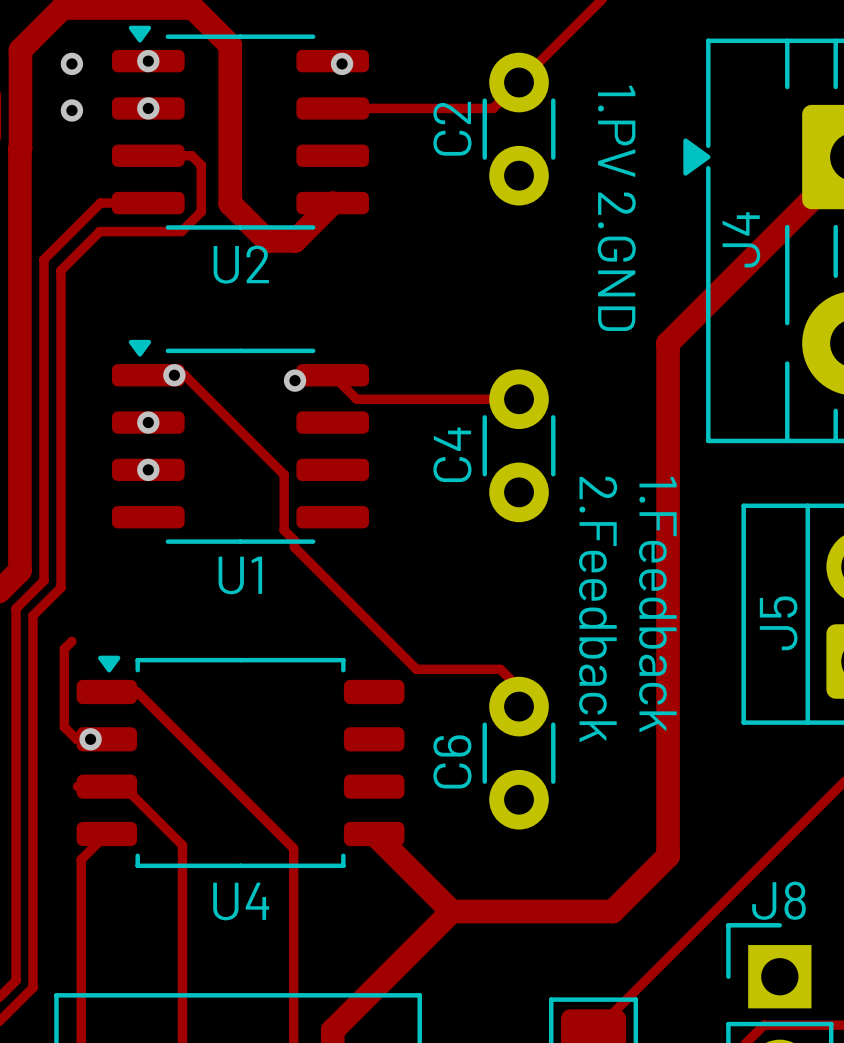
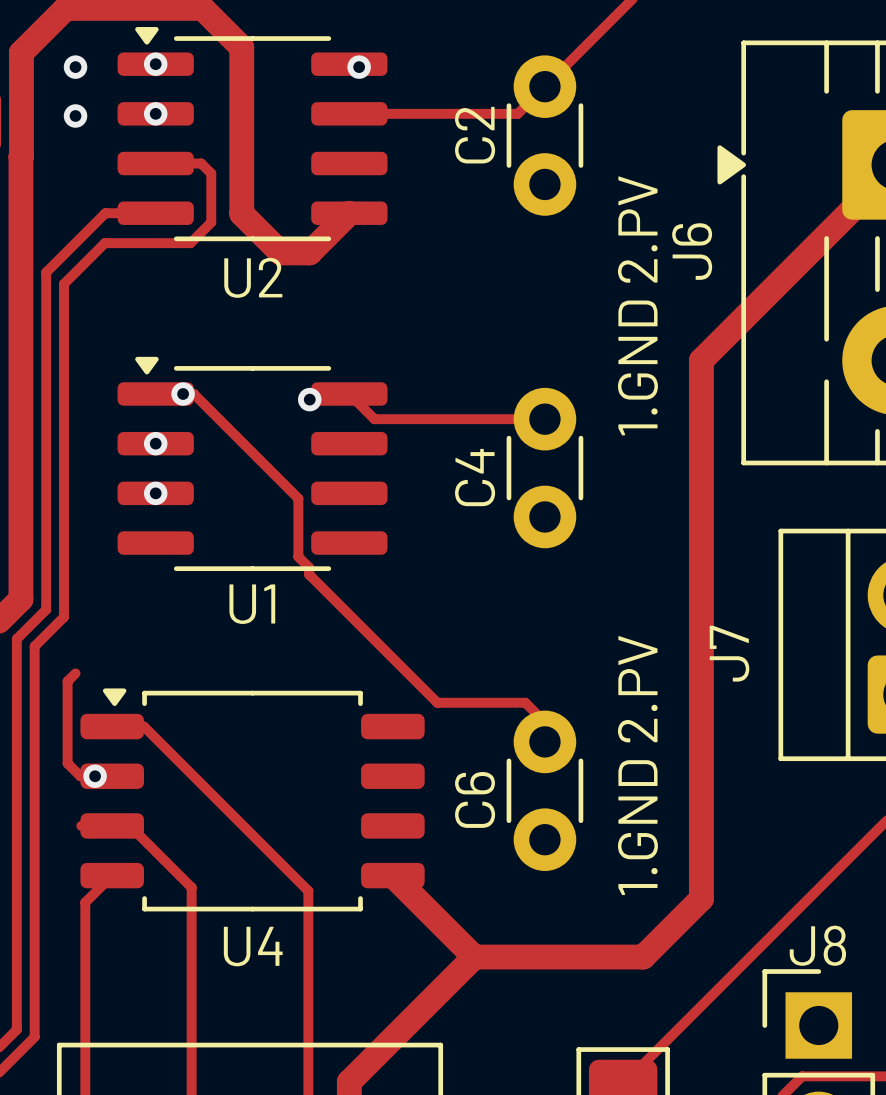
text: 1.PV 2.GND (616, 208) -> none
J4 name: J4 (741, 239) -> J6 (692, 251)
text: none -> 1.GND 2.PV (637, 305)
text: 1.Feedback (657, 604) -> none
text: 2.Feedback (598, 609) -> none
J5 name: J5 (778, 623) -> J7 (729, 653)
text: none -> 1.GND 2.PV (637, 765)

